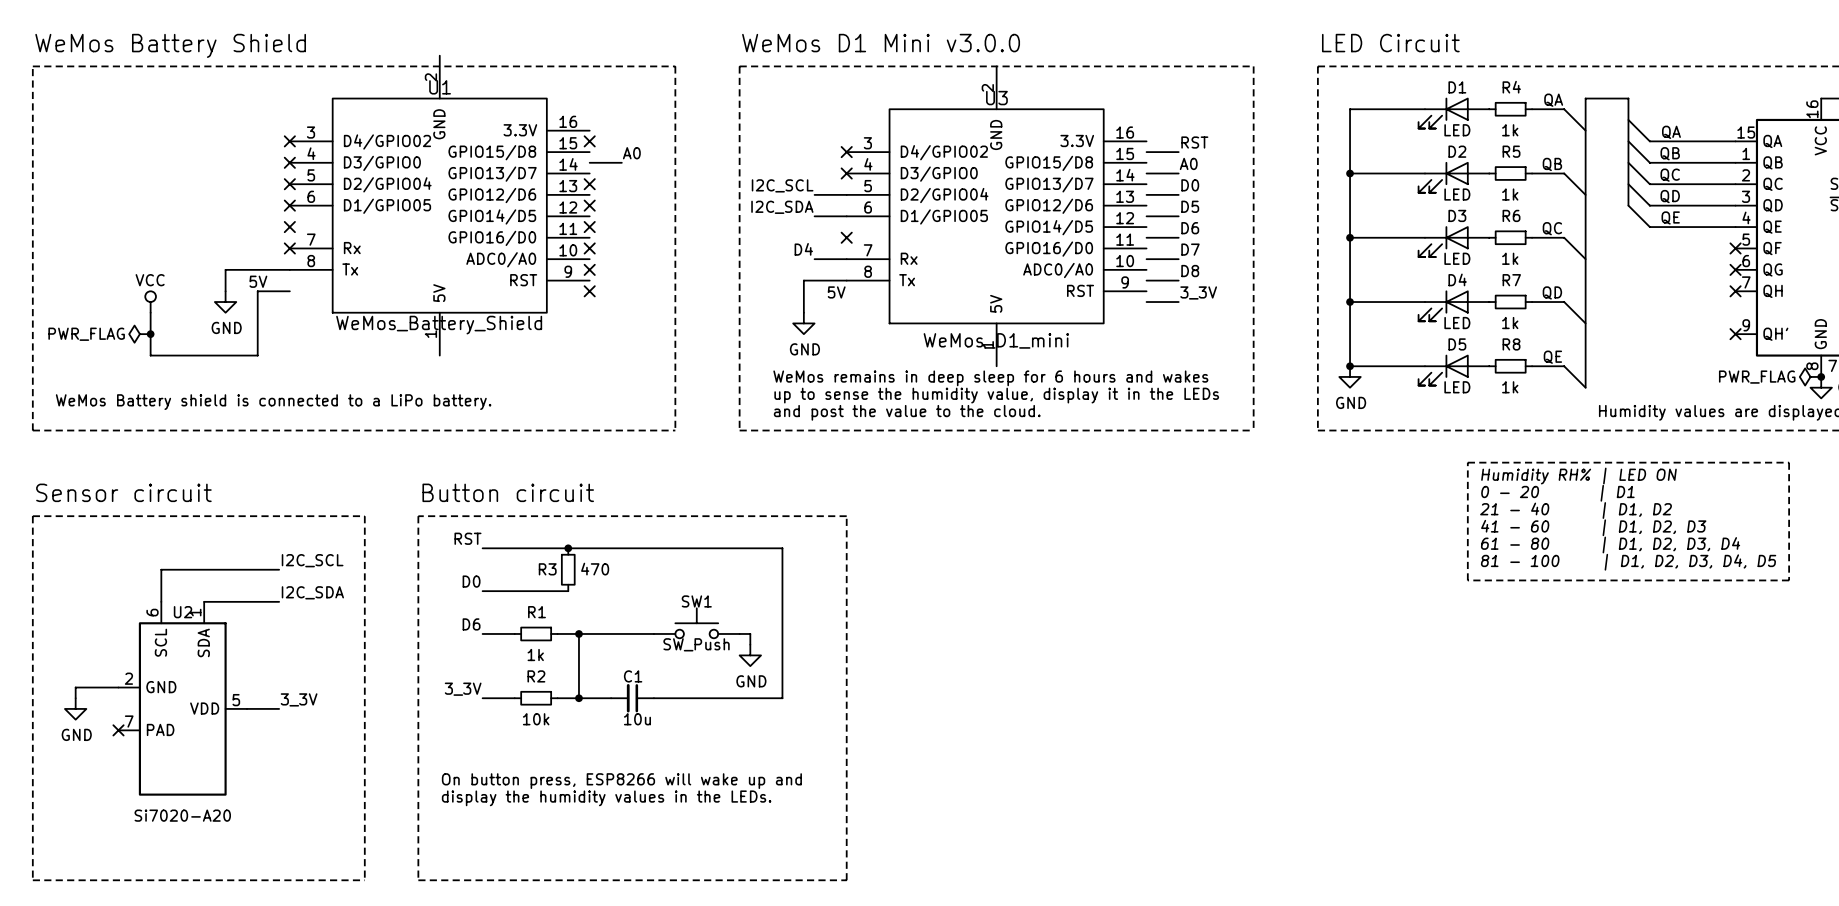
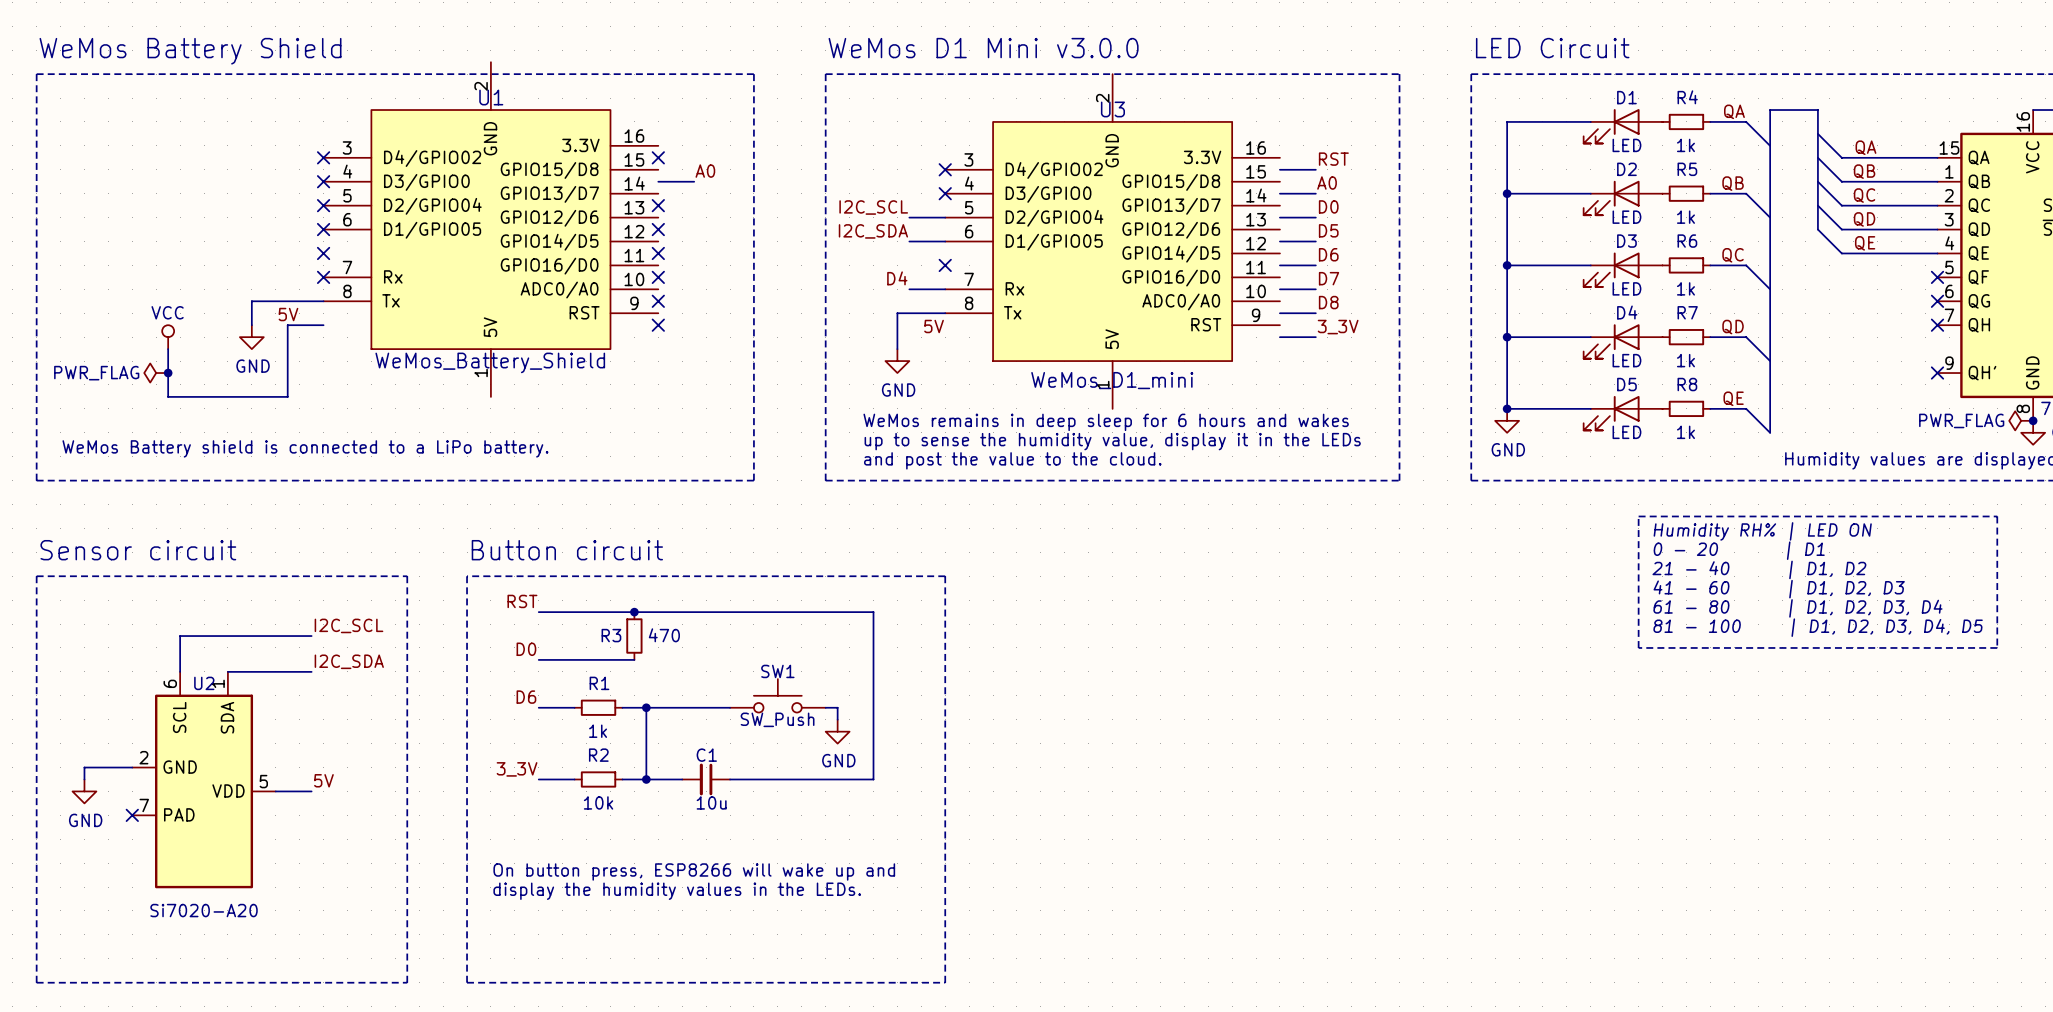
label: 3_3V (299, 699) -> 5V (323, 780)

